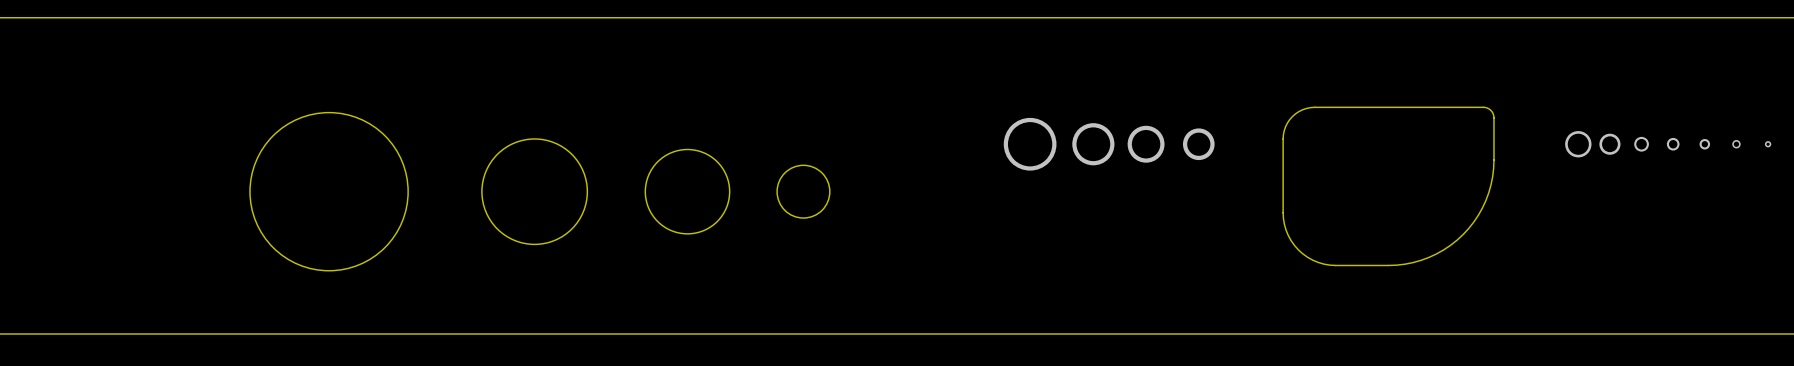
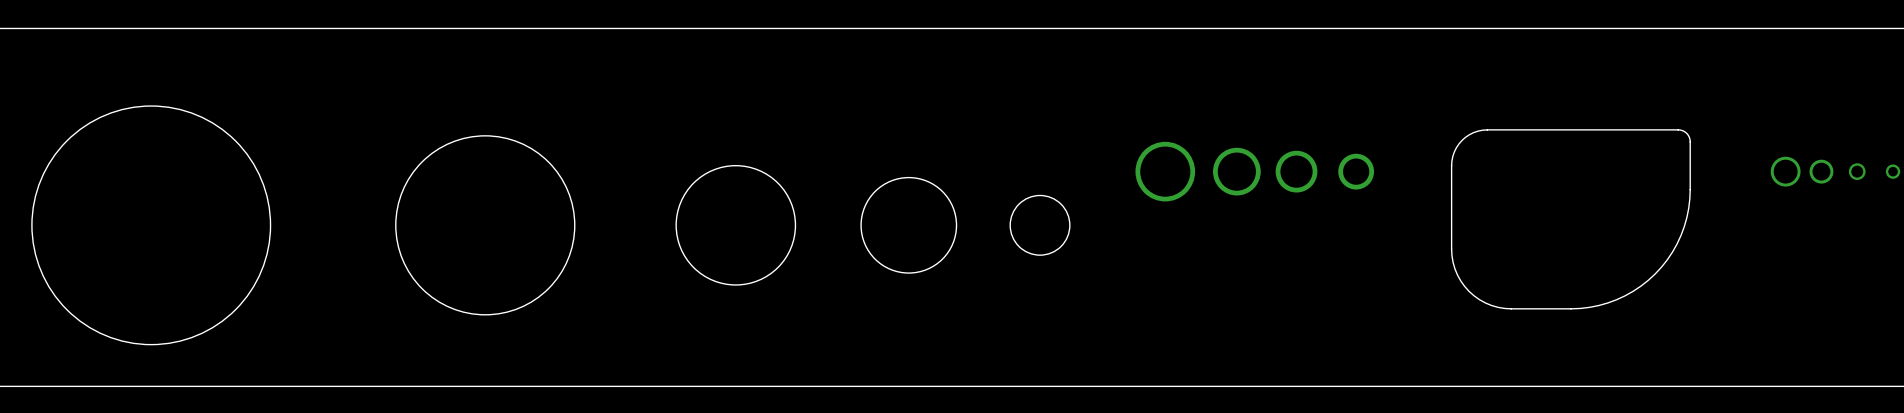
round board edge: none -> [31, 105, 272, 346]
round board edge position: (329, 191) -> (485, 225)
round board edge position: (534, 191) -> (735, 225)
round board edge position: (687, 191) -> (908, 225)
round board edge position: (803, 191) -> (1040, 225)

